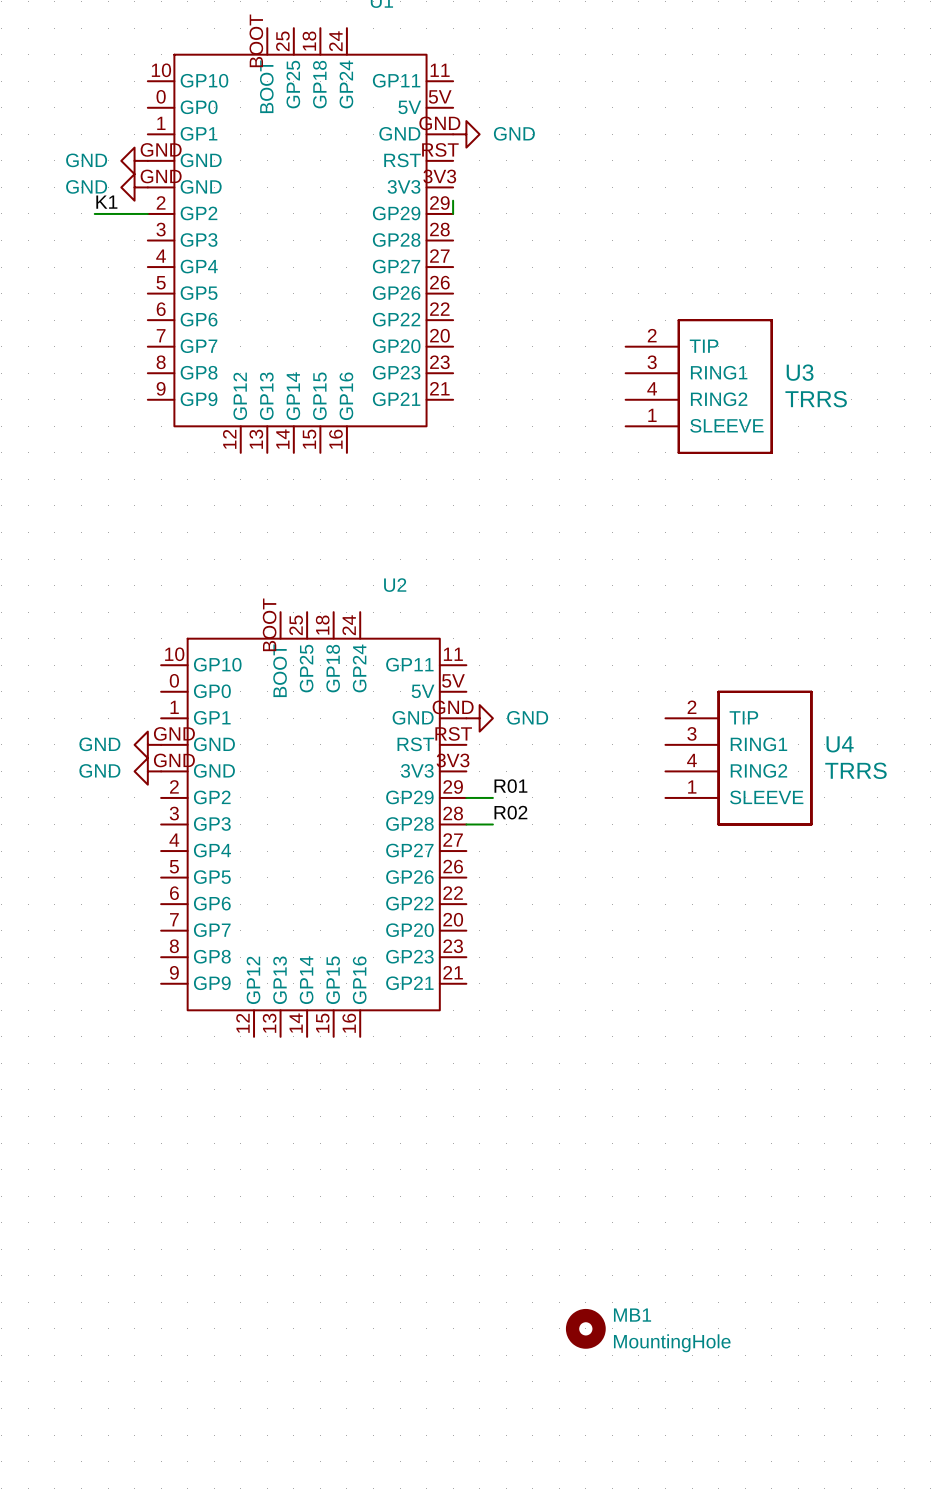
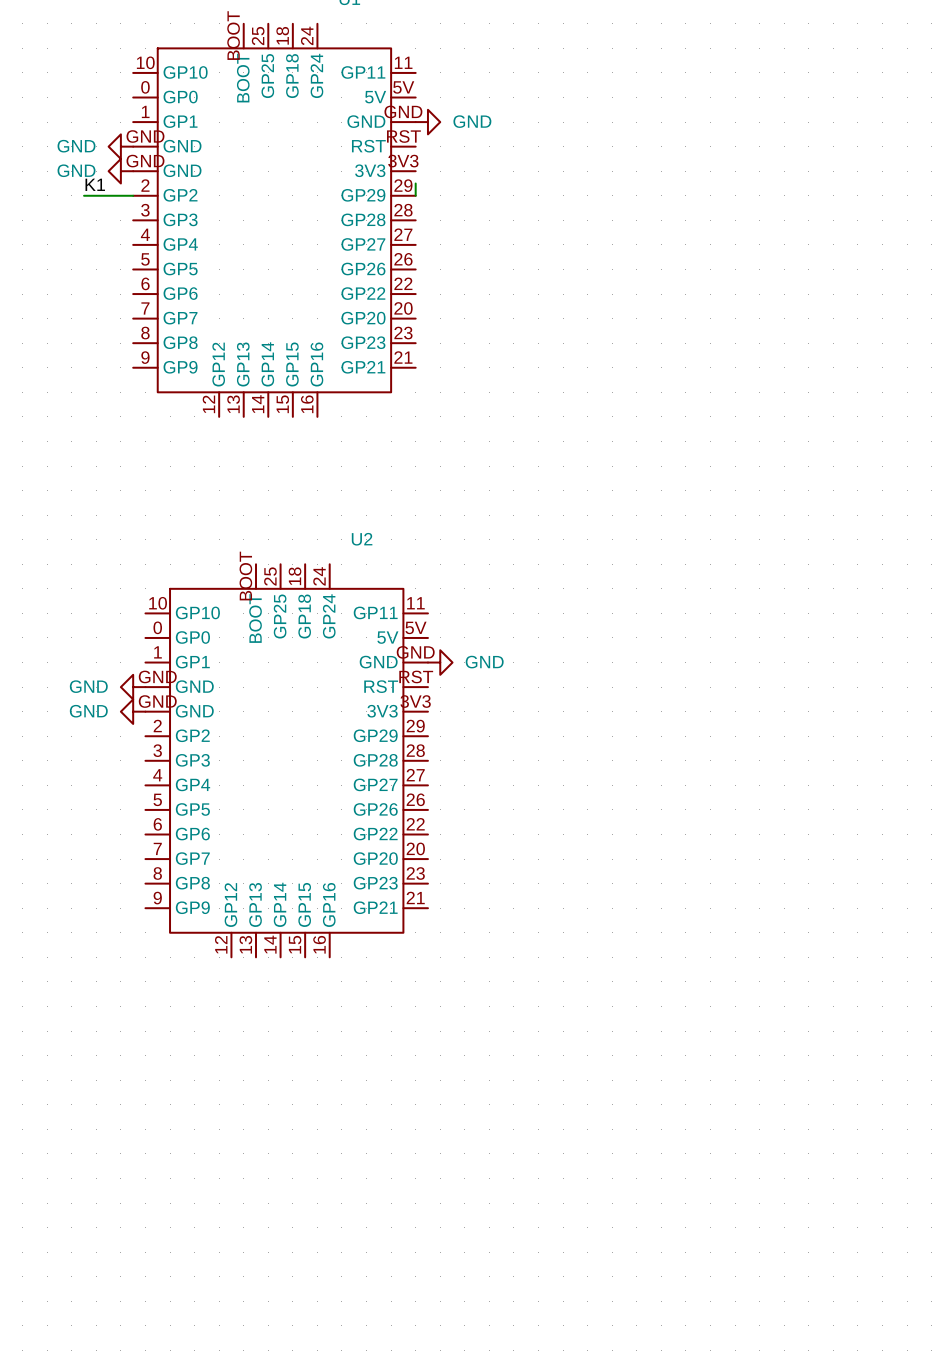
U3: TRRS (698, 386) -> none
U4: TRRS (738, 758) -> none
label: R01 (510, 786) -> none
wire: (466, 797) (492, 797) -> none
label: R02 (510, 812) -> none
wire: (466, 824) (492, 824) -> none
MB1: MountingHole (585, 1328) -> none

